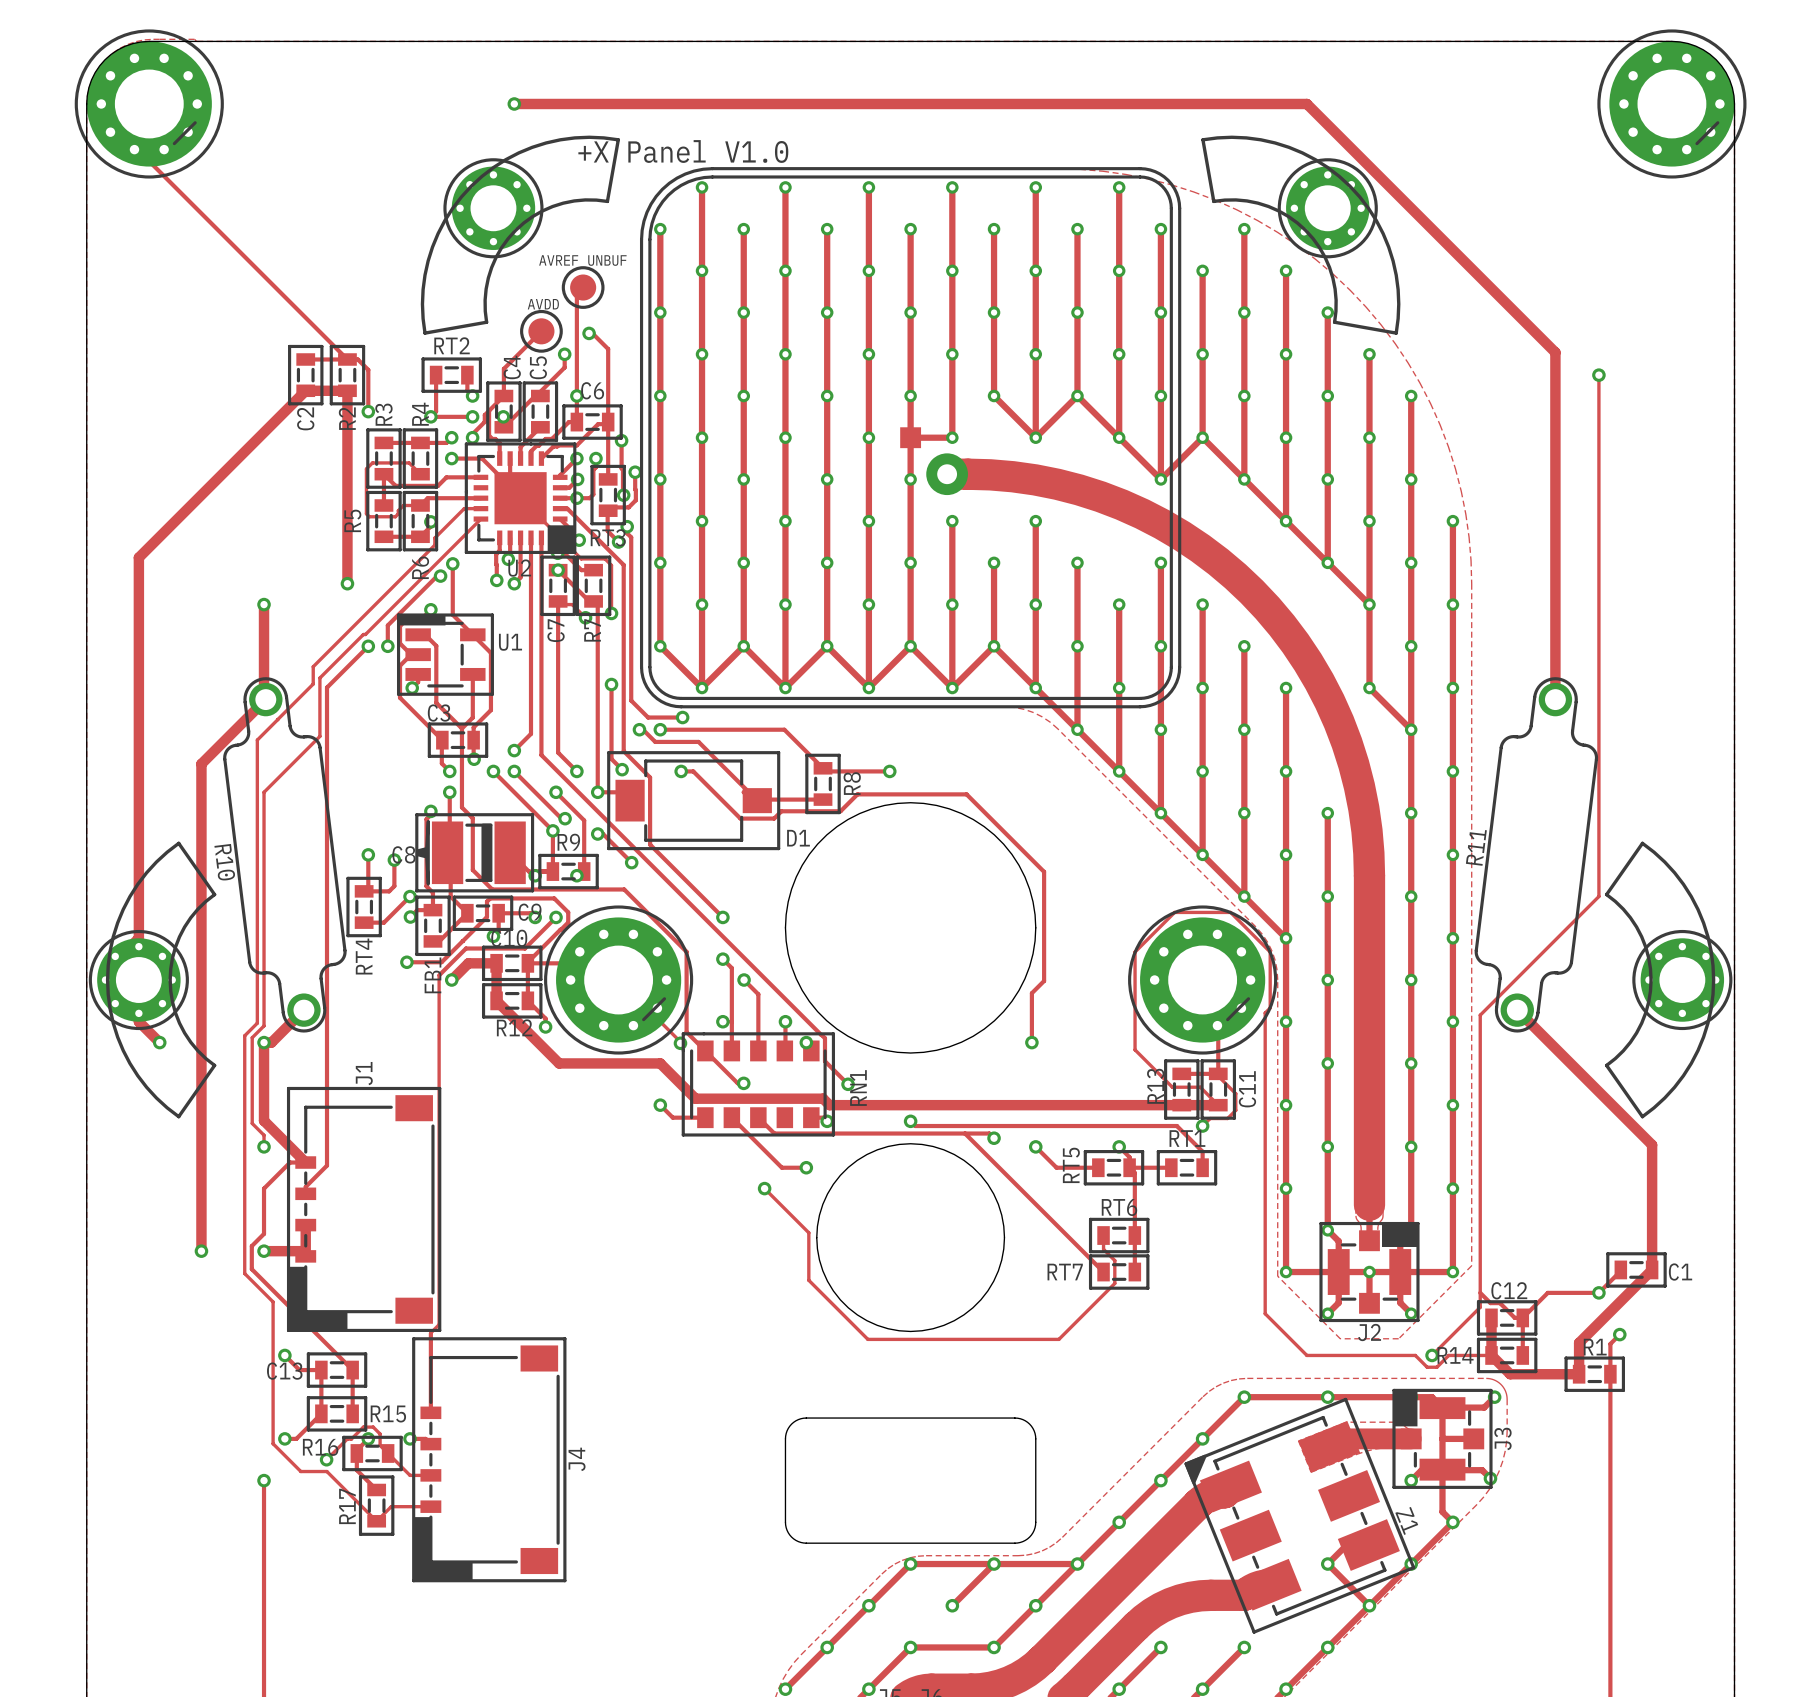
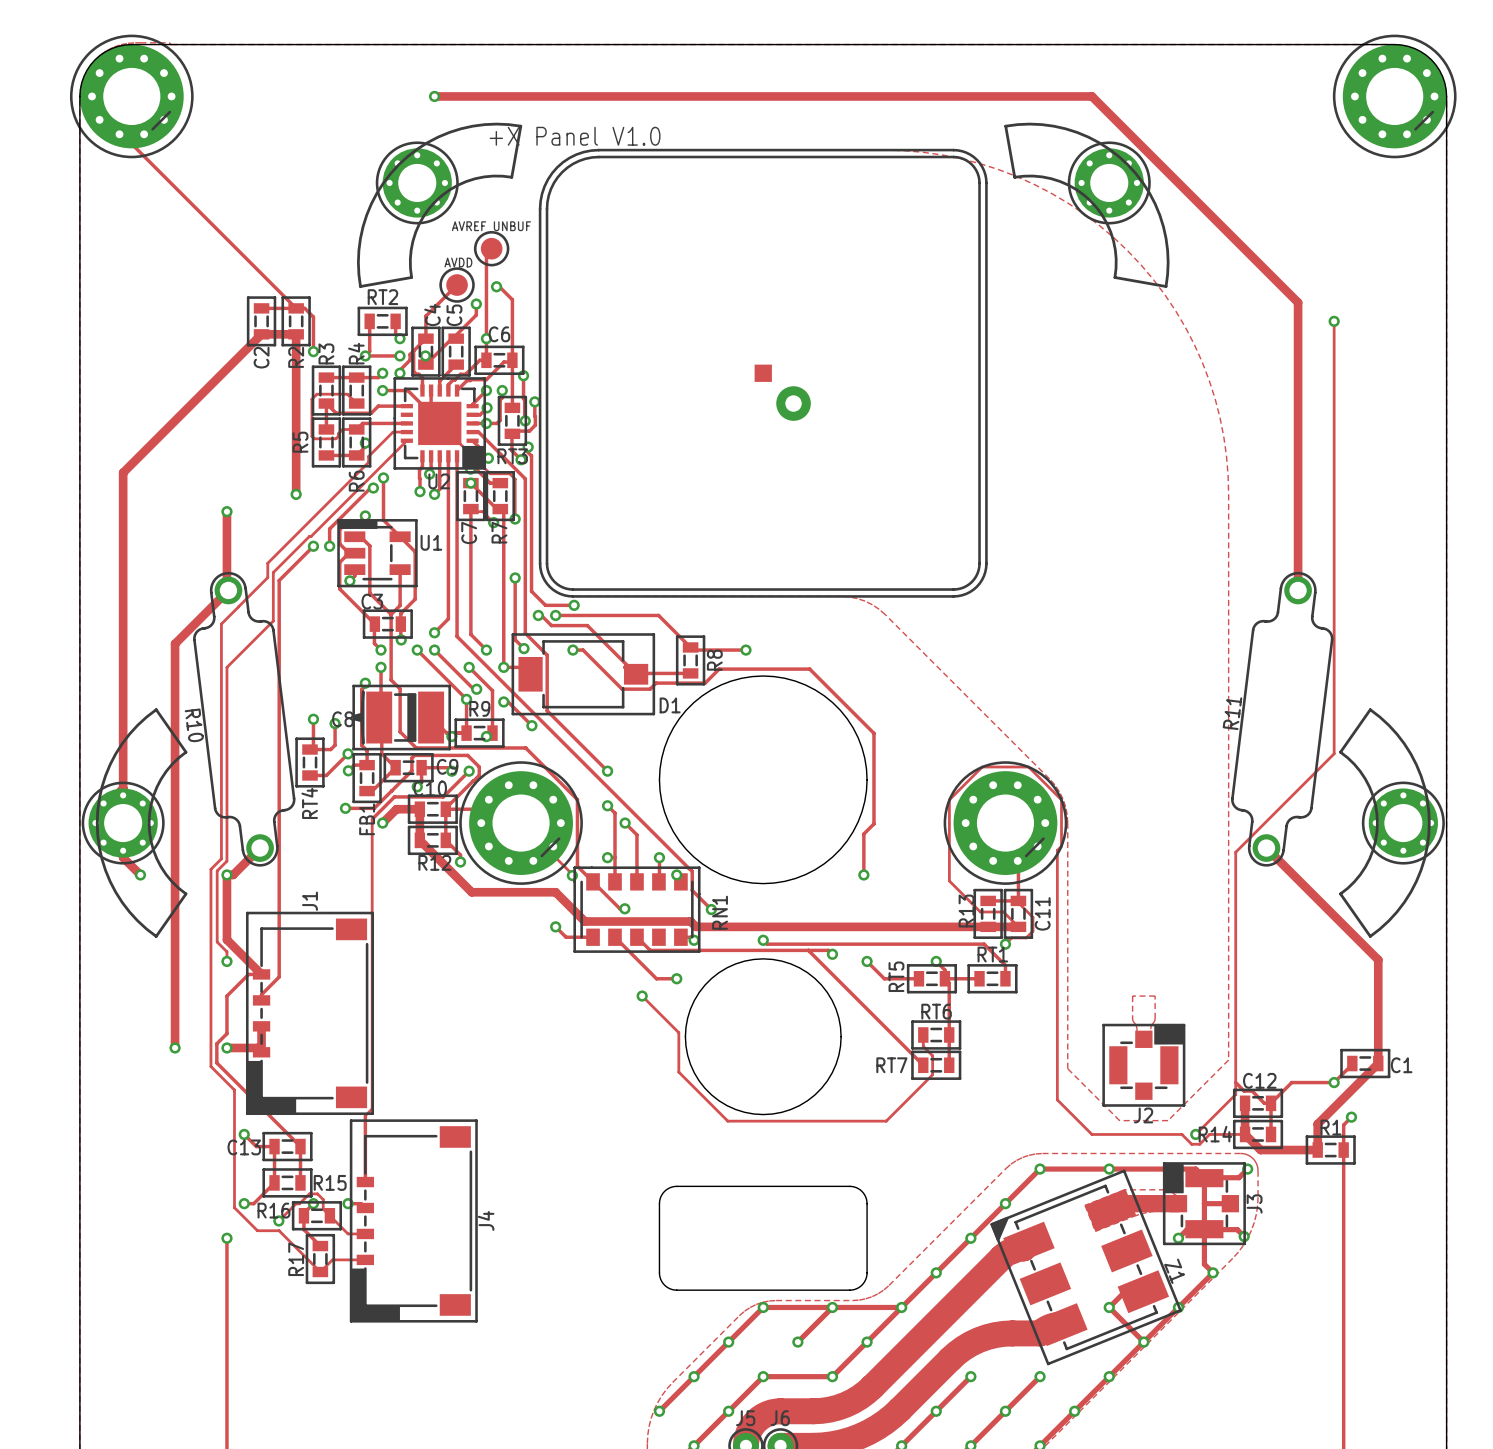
track: (702, 187) (702, 688) -> none
via: (702, 187) -> none
track: (785, 187) (785, 688) -> none
via: (785, 187) -> none
track: (868, 187) (868, 688) -> none
via: (868, 187) -> none
track: (952, 187) (952, 437) (910, 437) -> none
via: (952, 187) -> none
track: (1035, 187) (1035, 437) -> none
via: (1035, 187) -> none
track: (1119, 187) (1119, 437) -> none
via: (1119, 187) -> none
track: (660, 229) (660, 646) (702, 688) -> none
via: (660, 229) -> none
track: (743, 229) (743, 646) -> none
via: (743, 229) -> none
track: (827, 229) (827, 646) -> none
via: (827, 229) -> none
track: (910, 229) (910, 646) -> none
via: (910, 229) -> none
track: (994, 229) (994, 395) (1035, 437) -> none
via: (994, 229) -> none
track: (1077, 229) (1077, 395) -> none
via: (1077, 229) -> none
track: (1160, 229) (1160, 479) -> none
via: (1160, 229) -> none
track: (1244, 229) (1244, 479) -> none
via: (1244, 229) -> none
via: (702, 270) -> none
via: (785, 270) -> none
via: (868, 270) -> none
via: (952, 270) -> none
via: (1035, 270) -> none
via: (1119, 270) -> none
track: (1202, 270) (1202, 437) -> none
via: (1202, 270) -> none
track: (1286, 270) (1286, 521) -> none
via: (1286, 270) -> none
via: (660, 312) -> none
via: (743, 312) -> none
via: (827, 312) -> none
via: (910, 312) -> none
via: (994, 312) -> none
via: (1077, 312) -> none
via: (1160, 312) -> none
via: (1244, 312) -> none
track: (1327, 312) (1327, 562) -> none
via: (1327, 312) -> none
via: (702, 354) -> none
via: (785, 354) -> none
via: (868, 354) -> none
via: (952, 354) -> none
via: (1035, 354) -> none
via: (1119, 354) -> none
via: (1202, 354) -> none
via: (1286, 354) -> none
track: (1369, 354) (1369, 688) (1411, 729) -> none
via: (1369, 354) -> none
via: (660, 395) -> none
via: (743, 395) -> none
via: (827, 395) -> none
via: (910, 395) -> none
via: (994, 395) -> none
track: (1077, 395) (1035, 437) -> none
track: (1077, 395) (1160, 479) -> none
via: (1077, 395) -> none
via: (1160, 395) -> none
via: (1244, 395) -> none
via: (1327, 395) -> none
track: (1411, 395) (1411, 1230) (1400, 1241) (1400, 1302) (1411, 1313) -> none
via: (1411, 395) -> none
via: (702, 437) -> none
via: (785, 437) -> none
via: (868, 437) -> none
via: (952, 437) -> none
via: (1035, 437) -> none
via: (1119, 437) -> none
track: (1202, 437) (1160, 479) -> none
track: (1202, 437) (1369, 604) -> none
via: (1202, 437) -> none
via: (1286, 437) -> none
via: (1369, 437) -> none
track: (947, 474) (1012, 476) (1057, 484) (1100, 496) (1162, 524) (1218, 561) (1251, 591) (1281, 625) (1319, 681) (1338, 722) (1353, 764) (1366, 830) (1369, 875) (1369, 1240) -> none
via: (660, 479) -> none
via: (743, 479) -> none
via: (827, 479) -> none
via: (910, 479) -> none
via: (1160, 479) -> none
via: (1244, 479) -> none
via: (1327, 479) -> none
via: (1411, 479) -> none
via: (702, 521) -> none
via: (785, 521) -> none
via: (868, 521) -> none
track: (952, 521) (952, 688) -> none
via: (952, 521) -> none
track: (1035, 521) (1035, 688) -> none
via: (1035, 521) -> none
via: (1286, 521) -> none
via: (1369, 521) -> none
track: (1452, 521) (1452, 1272) (1286, 1272) (1286, 688) -> none
via: (1452, 521) -> none
via: (660, 562) -> none
via: (743, 562) -> none
via: (827, 562) -> none
via: (910, 562) -> none
track: (994, 562) (994, 646) -> none
via: (994, 562) -> none
track: (1077, 562) (1077, 729) -> none
via: (1077, 562) -> none
track: (1160, 562) (1160, 813) -> none
via: (1160, 562) -> none
via: (1327, 562) -> none
via: (1411, 562) -> none
via: (702, 604) -> none
via: (785, 604) -> none
via: (868, 604) -> none
via: (952, 604) -> none
via: (1035, 604) -> none
track: (1119, 604) (1119, 771) -> none
via: (1119, 604) -> none
track: (1202, 604) (1202, 854) -> none
via: (1202, 604) -> none
via: (1369, 604) -> none
via: (1452, 604) -> none
via: (660, 646) -> none
track: (743, 646) (785, 688) -> none
track: (743, 646) (702, 688) -> none
via: (743, 646) -> none
track: (827, 646) (868, 688) -> none
track: (827, 646) (785, 688) -> none
via: (827, 646) -> none
track: (910, 646) (952, 688) -> none
track: (910, 646) (868, 688) -> none
via: (910, 646) -> none
track: (994, 646) (1286, 938) -> none
track: (994, 646) (952, 688) -> none
via: (994, 646) -> none
via: (1077, 646) -> none
via: (1160, 646) -> none
track: (1244, 646) (1244, 896) -> none
via: (1244, 646) -> none
via: (1411, 646) -> none
via: (702, 688) -> none
via: (785, 688) -> none
via: (868, 688) -> none
via: (952, 688) -> none
via: (1035, 688) -> none
via: (1119, 688) -> none
via: (1202, 688) -> none
via: (1286, 688) -> none
via: (1369, 688) -> none
via: (1452, 688) -> none
via: (1077, 729) -> none
via: (1160, 729) -> none
via: (1244, 729) -> none
via: (1411, 729) -> none
via: (1119, 771) -> none
via: (1202, 771) -> none
via: (1286, 771) -> none
via: (1452, 771) -> none
via: (1160, 813) -> none
via: (1244, 813) -> none
track: (1327, 813) (1327, 1230) (1338, 1241) (1338, 1302) (1327, 1313) -> none
via: (1327, 813) -> none
via: (1411, 813) -> none
via: (1202, 854) -> none
via: (1286, 854) -> none
via: (1452, 854) -> none
via: (1244, 896) -> none
via: (1327, 896) -> none
via: (1411, 896) -> none
via: (1286, 938) -> none
via: (1452, 938) -> none
via: (1327, 980) -> none
via: (1411, 980) -> none
via: (1286, 1021) -> none
via: (1452, 1021) -> none
via: (1327, 1063) -> none
via: (1411, 1063) -> none
via: (1286, 1105) -> none
via: (1452, 1105) -> none
via: (1327, 1146) -> none
via: (1411, 1146) -> none
via: (1286, 1188) -> none
via: (1452, 1188) -> none
via: (1327, 1230) -> none
via: (1286, 1272) -> none
track: (1369, 1272) (1369, 1303) -> none
via: (1369, 1272) -> none
via: (1452, 1272) -> none
via: (1327, 1313) -> none
via: (1411, 1313) -> none

